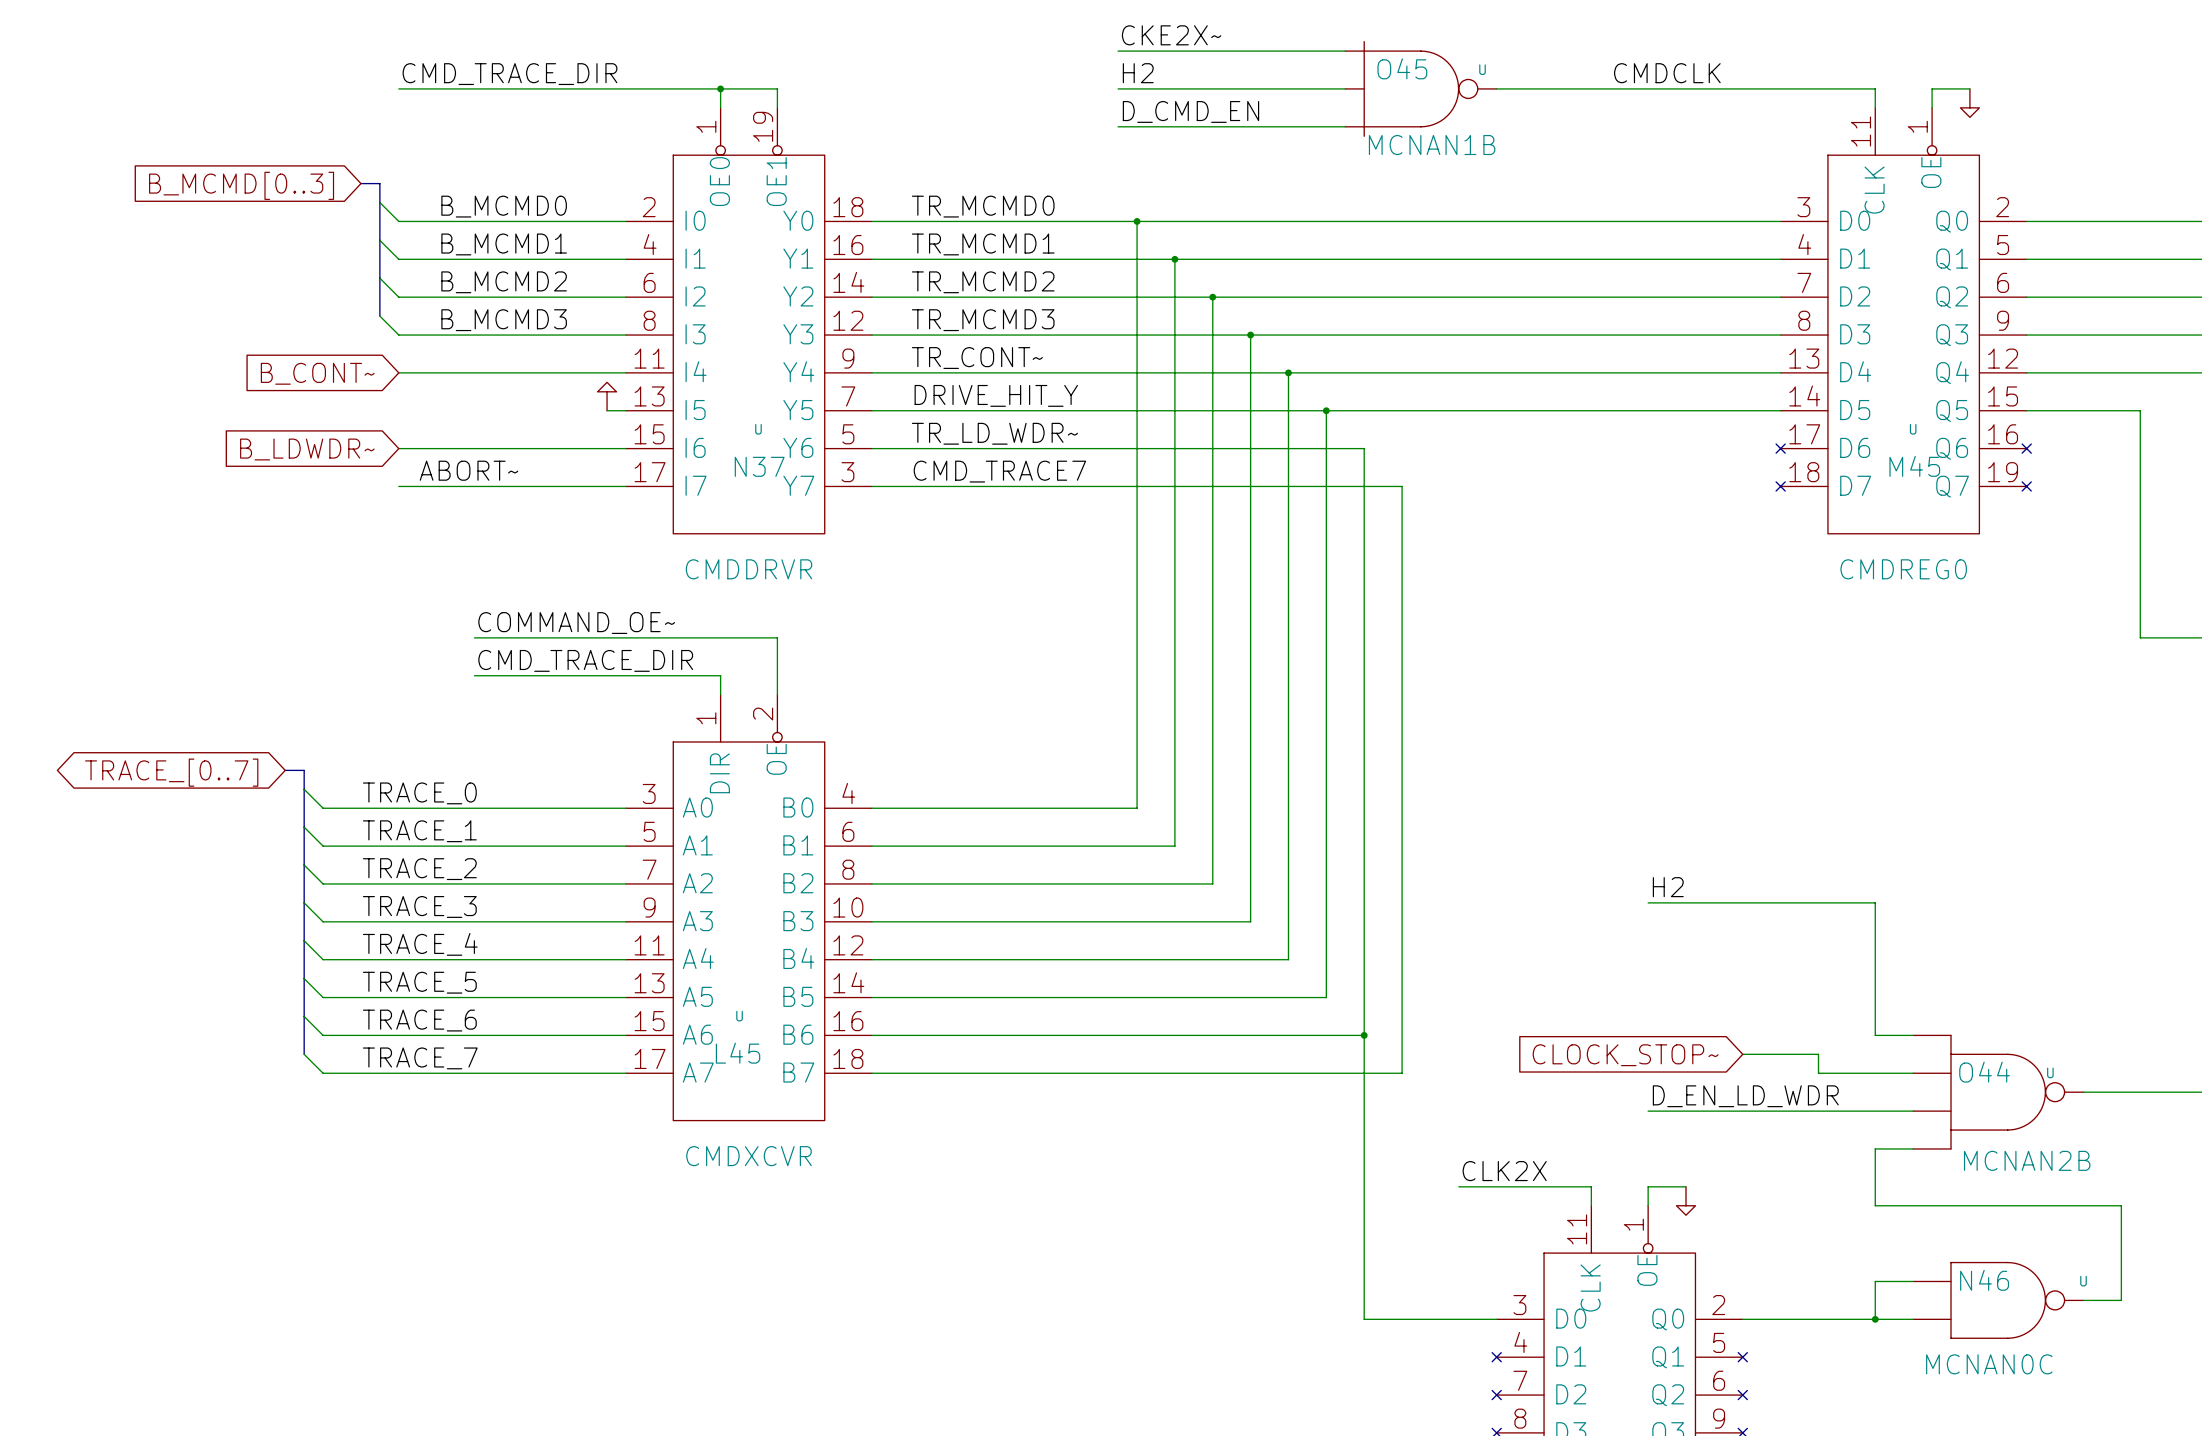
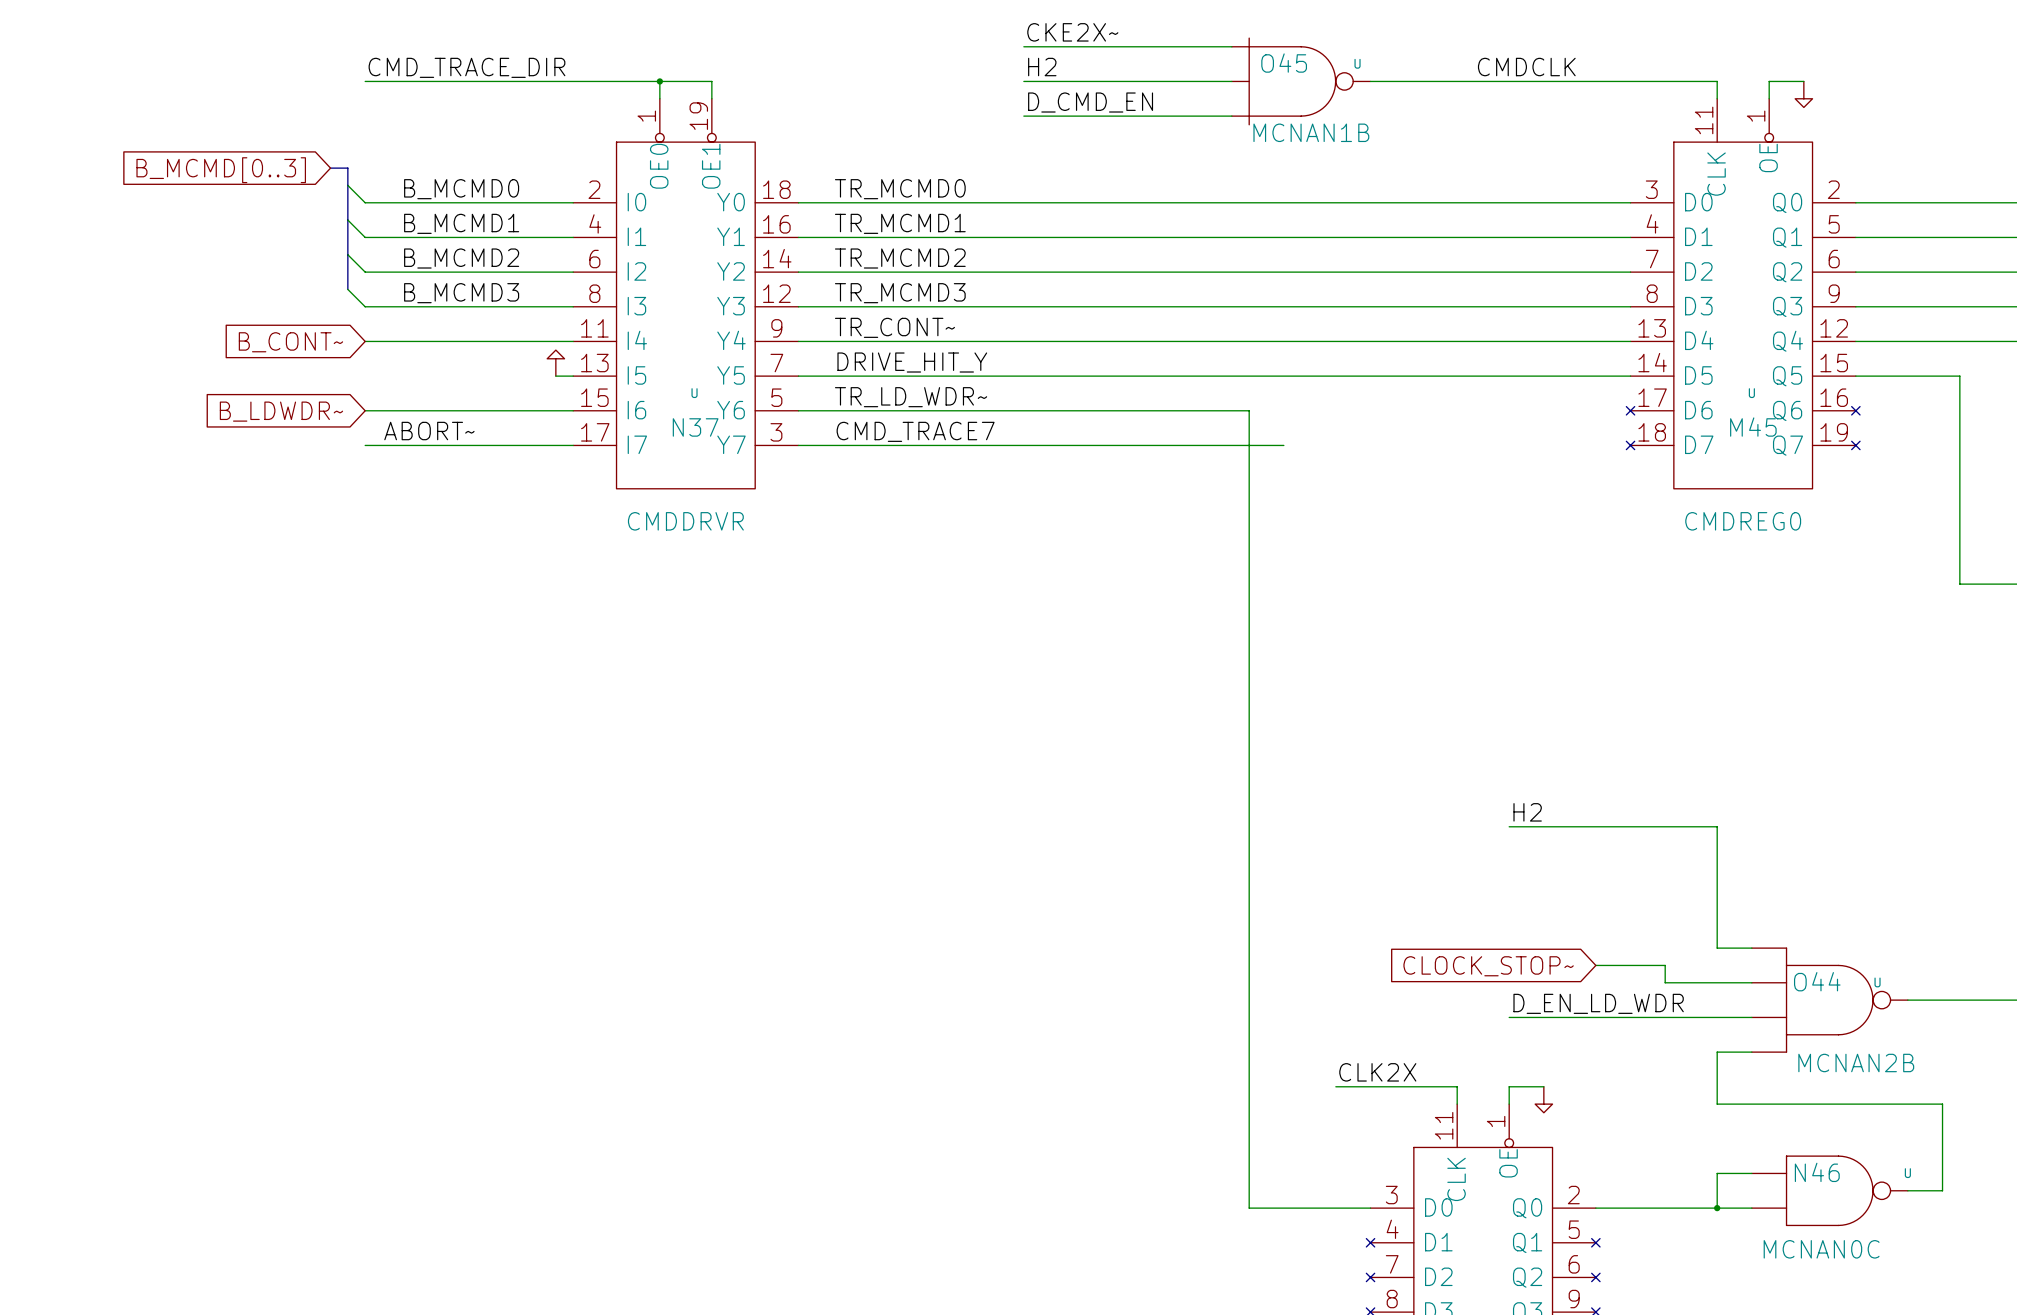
wire: (1137, 221) (1137, 808) (872, 808) -> none
junction: (1137, 221) -> none
wire: (1174, 259) (1174, 846) (872, 846) -> none
junction: (1174, 259) -> none
wire: (1212, 297) (1212, 883) (872, 883) -> none
junction: (1212, 297) -> none
wire: (1250, 335) (1250, 921) (872, 921) -> none
junction: (1250, 335) -> none
wire: (1288, 372) (1288, 959) (872, 959) -> none
junction: (1288, 372) -> none
wire: (1326, 410) (1326, 997) (872, 997) -> none
junction: (1326, 410) -> none
wire: (1402, 486) (1402, 1073) (872, 1073) -> none
label: COMMAND_OE~ (576, 623) -> none
wire: (474, 637) (777, 637) (777, 694) -> none
label: CMD_TRACE_DIR (585, 660) -> none
wire: (474, 675) (720, 675) (720, 694) -> none
bus: (285, 770) (304, 770) (304, 1054) -> none
global label: TRACE_[0..7] (171, 772) -> none
wire: (304, 789) (323, 808) (625, 808) -> none
label: TRACE_0 (419, 793) -> none
wire: (304, 827) (323, 846) (625, 846) -> none
label: TRACE_1 (419, 831) -> none
wire: (304, 865) (323, 883) (625, 883) -> none
label: TRACE_2 (419, 869) -> none
wire: (304, 902) (323, 921) (625, 921) -> none
label: TRACE_3 (419, 906) -> none
U: (749, 907) -> none
wire: (304, 940) (323, 959) (625, 959) -> none
label: TRACE_4 (420, 944) -> none
wire: (304, 978) (323, 997) (625, 997) -> none
label: TRACE_5 (419, 982) -> none
wire: (304, 1016) (323, 1035) (625, 1035) -> none
label: TRACE_6 (419, 1020) -> none
wire: (872, 1035) (1364, 1035) -> none
junction: (1364, 1035) -> none
wire: (304, 1054) (323, 1073) (625, 1073) -> none
label: TRACE_7 (420, 1058) -> none

